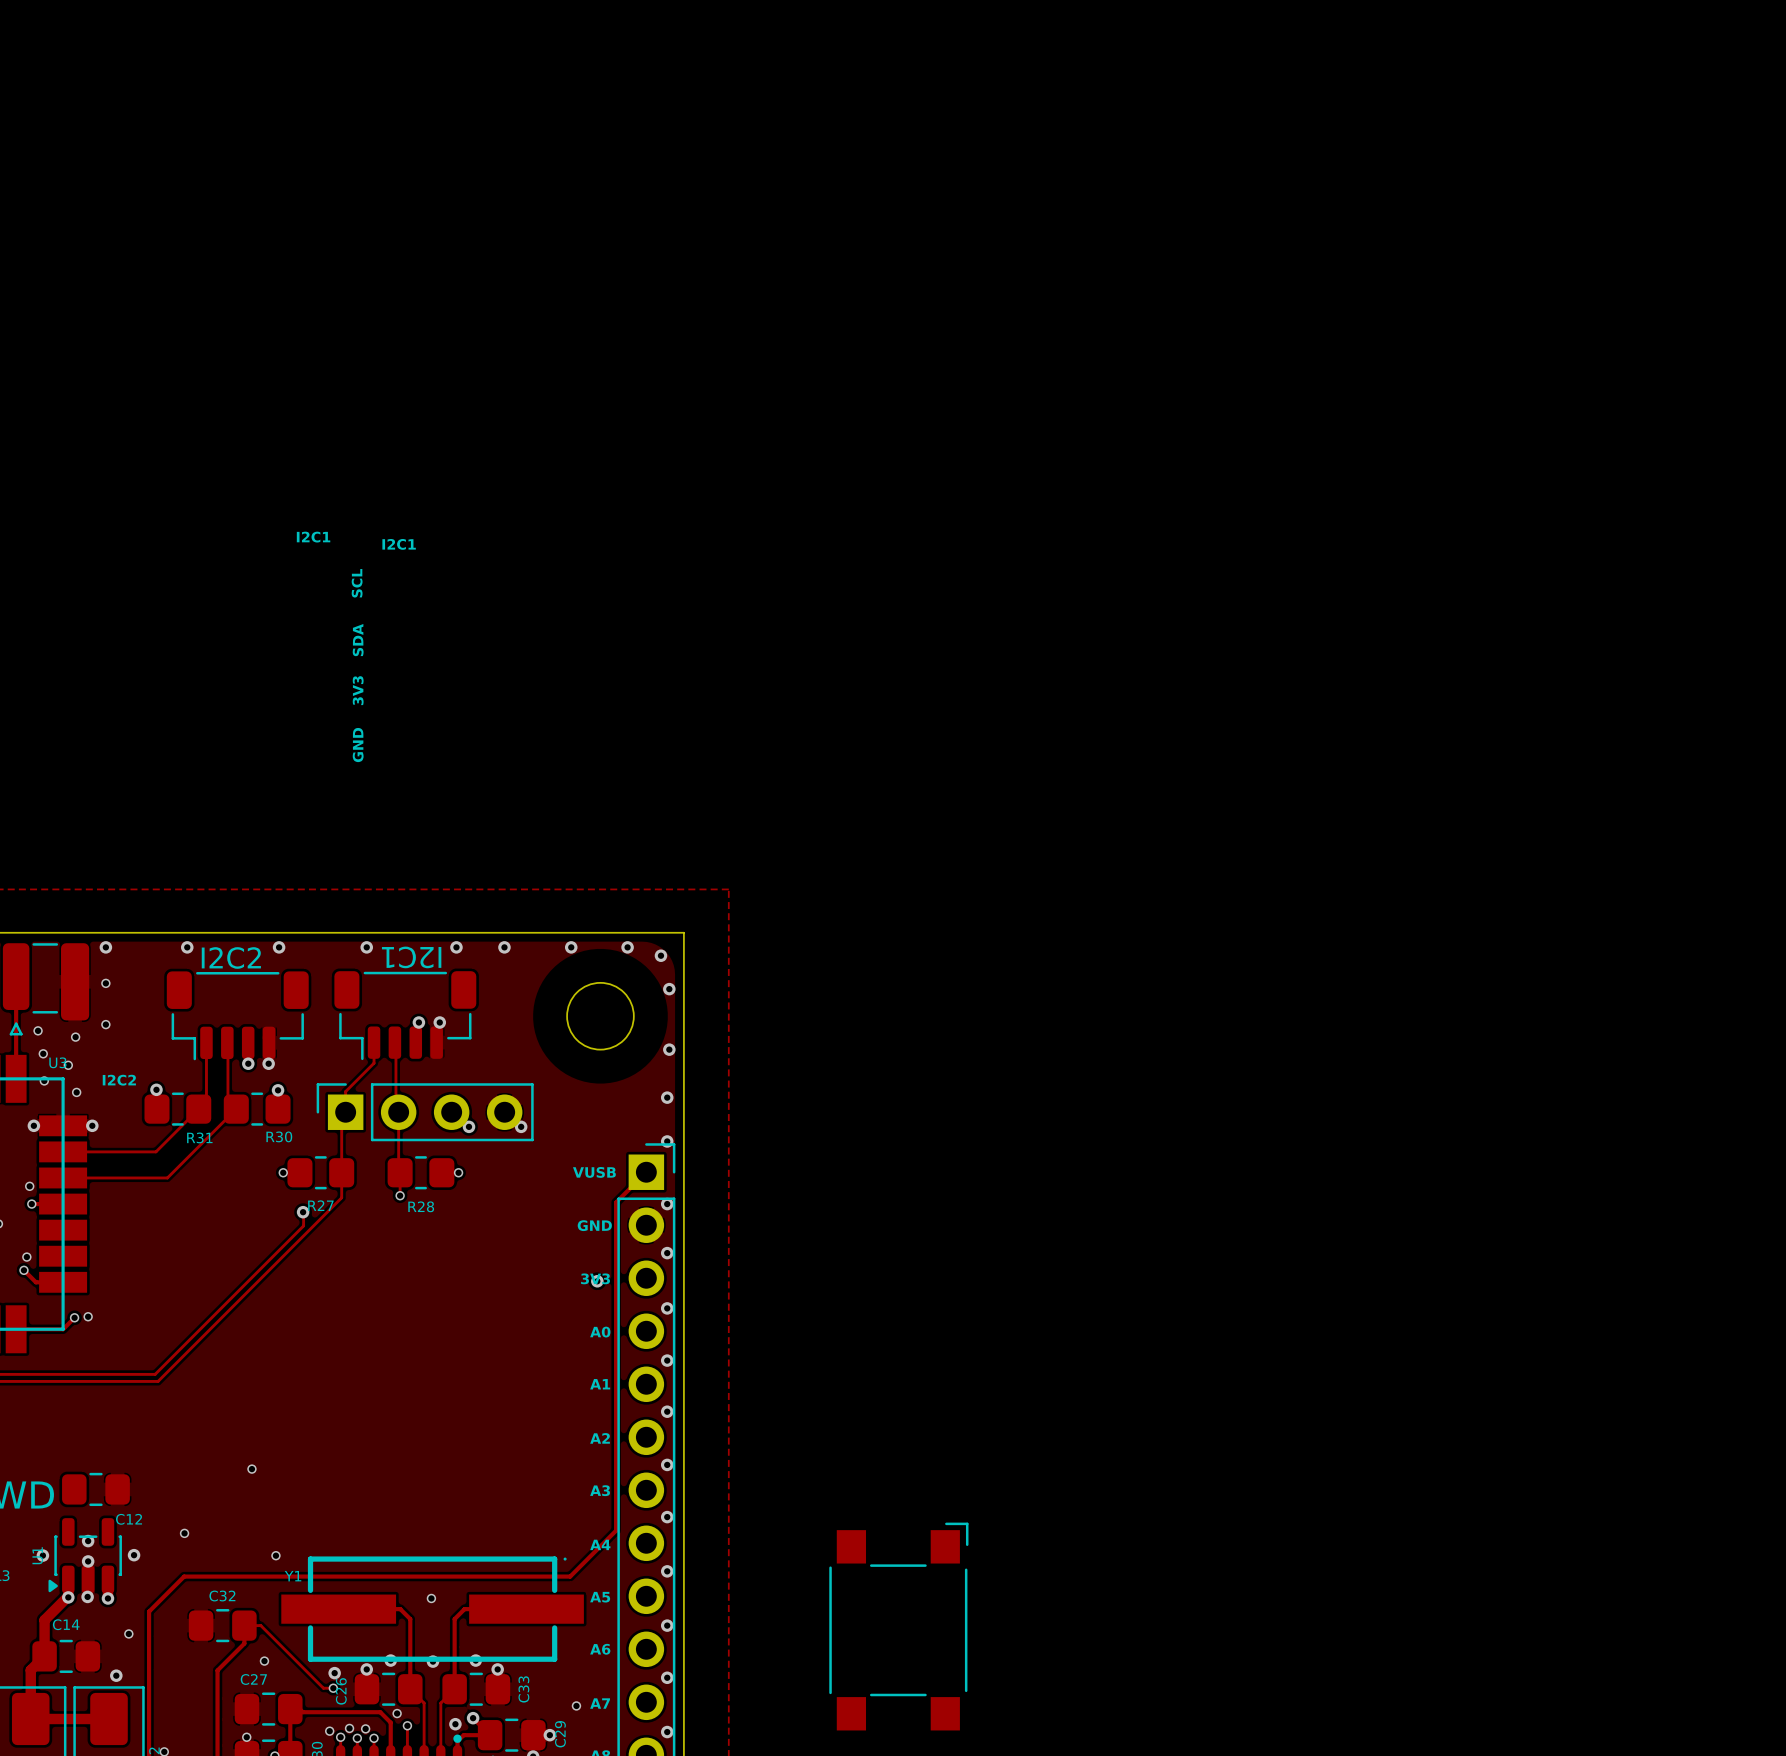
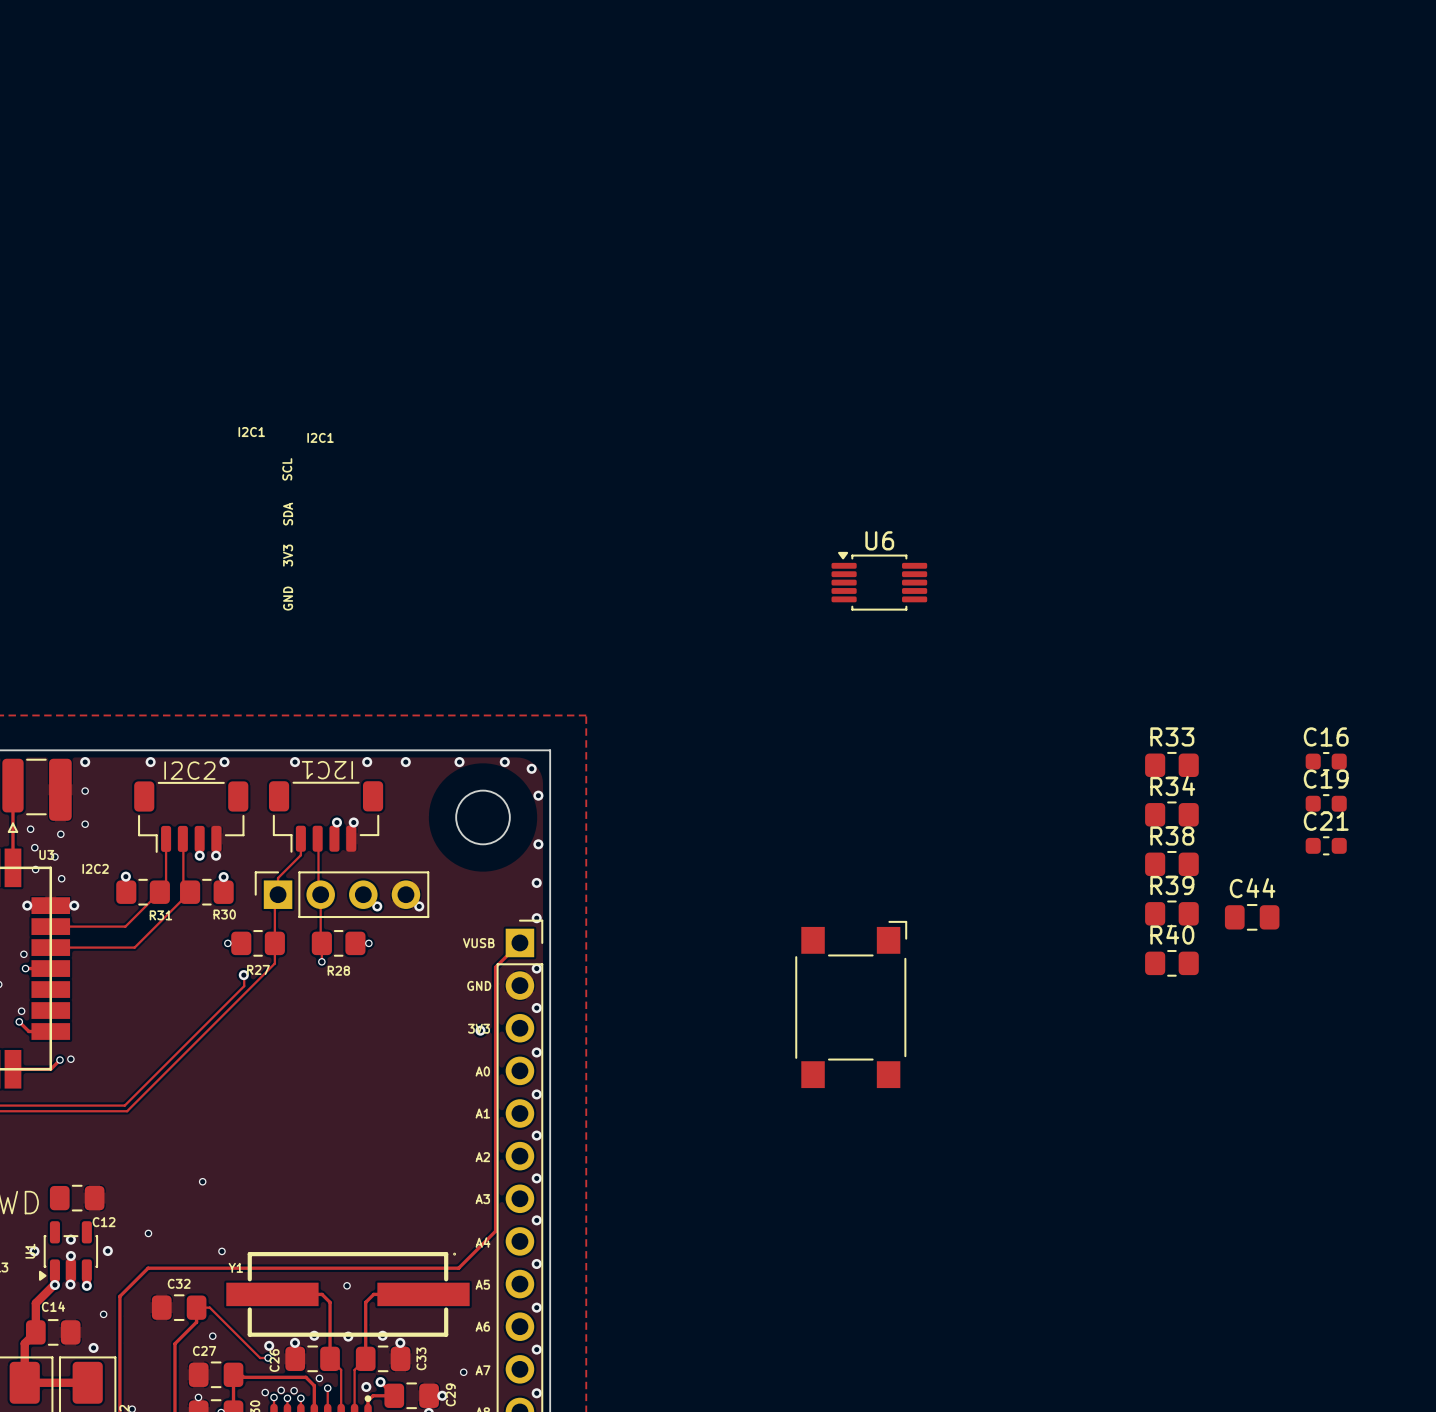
U6: none -> (879, 581)
C16: none -> (1326, 761)
R33: none -> (1171, 765)
C19: none -> (1326, 803)
R34: none -> (1171, 814)
C21: none -> (1326, 845)
R38: none -> (1171, 864)
R39: none -> (1171, 913)
C44: none -> (1252, 917)
R40: none -> (1171, 963)
part position: (898, 1626) -> (851, 1004)

